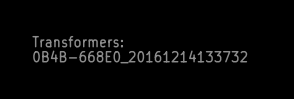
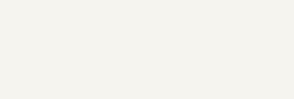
text: Transformers: (77, 41) -> none
text: 0B4B-668E0_20161214133732 (140, 56) -> none

